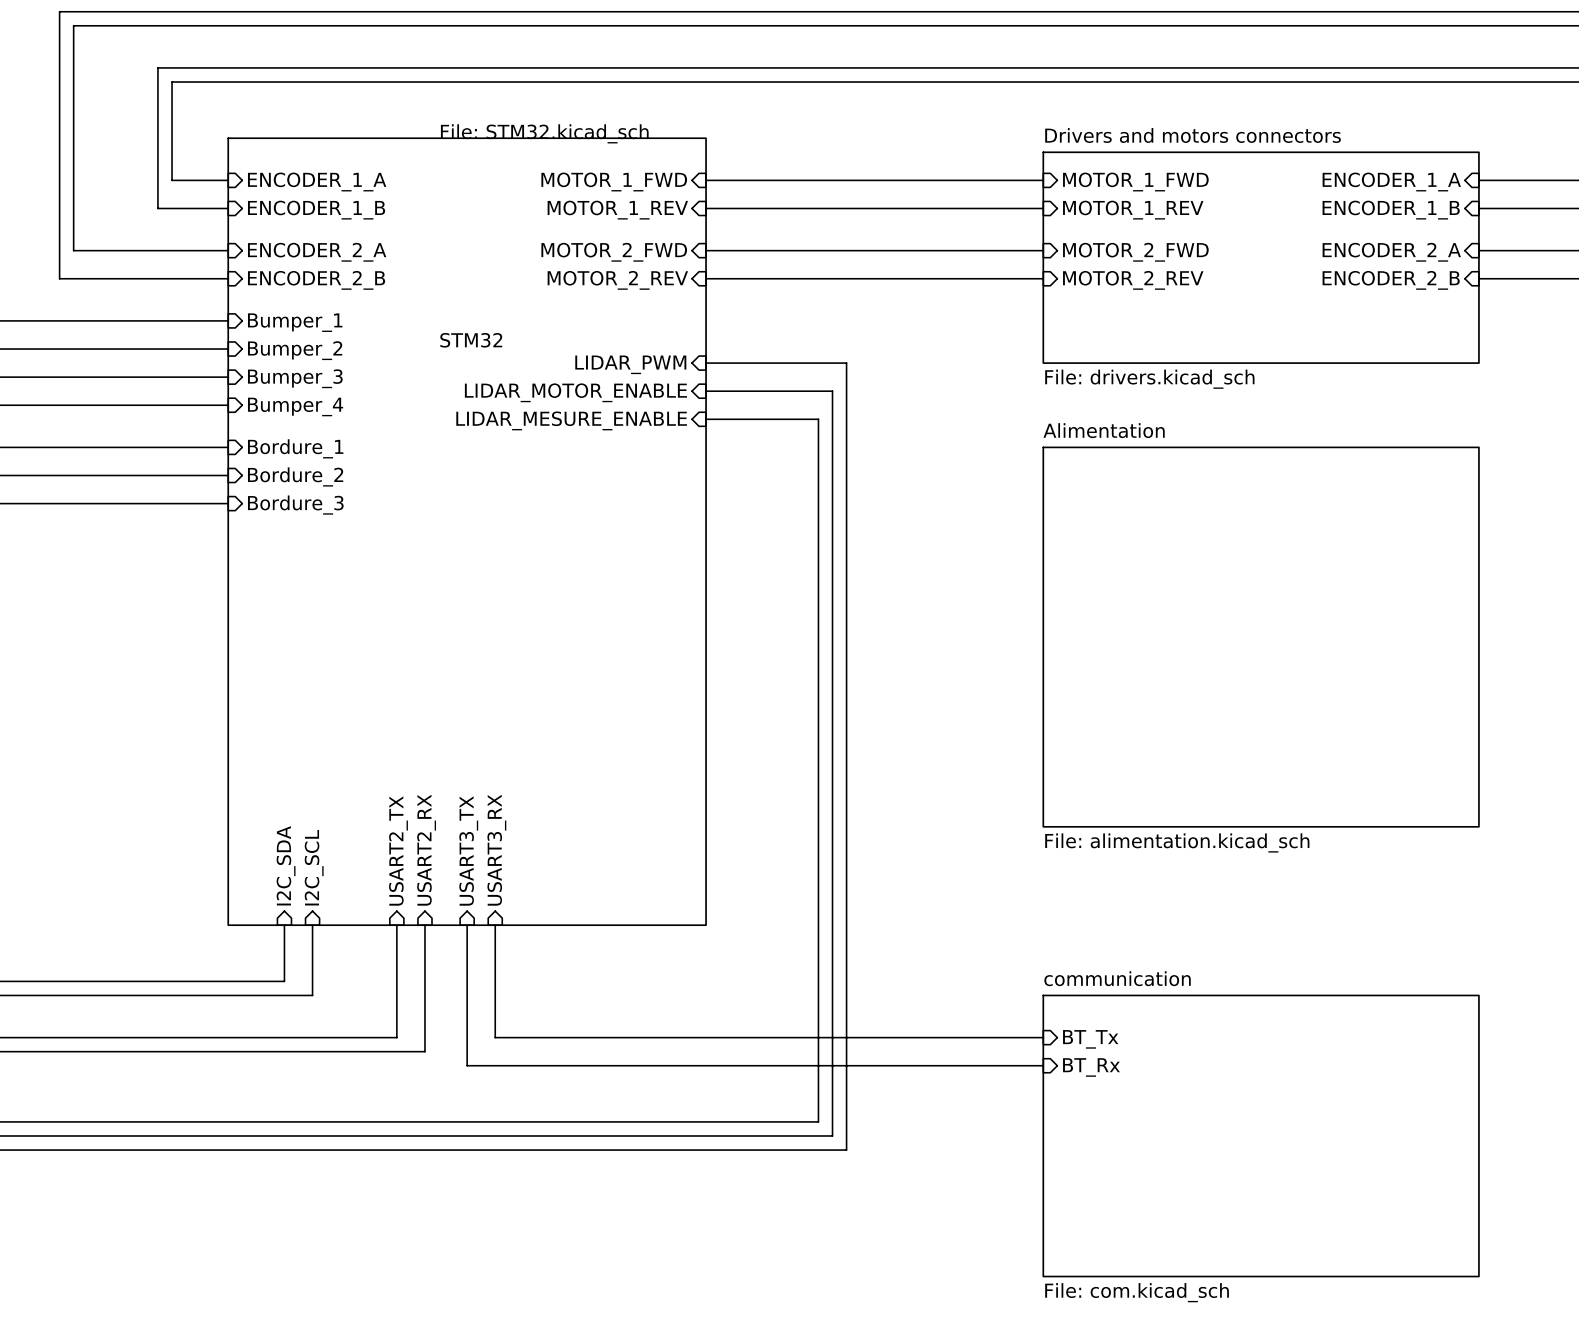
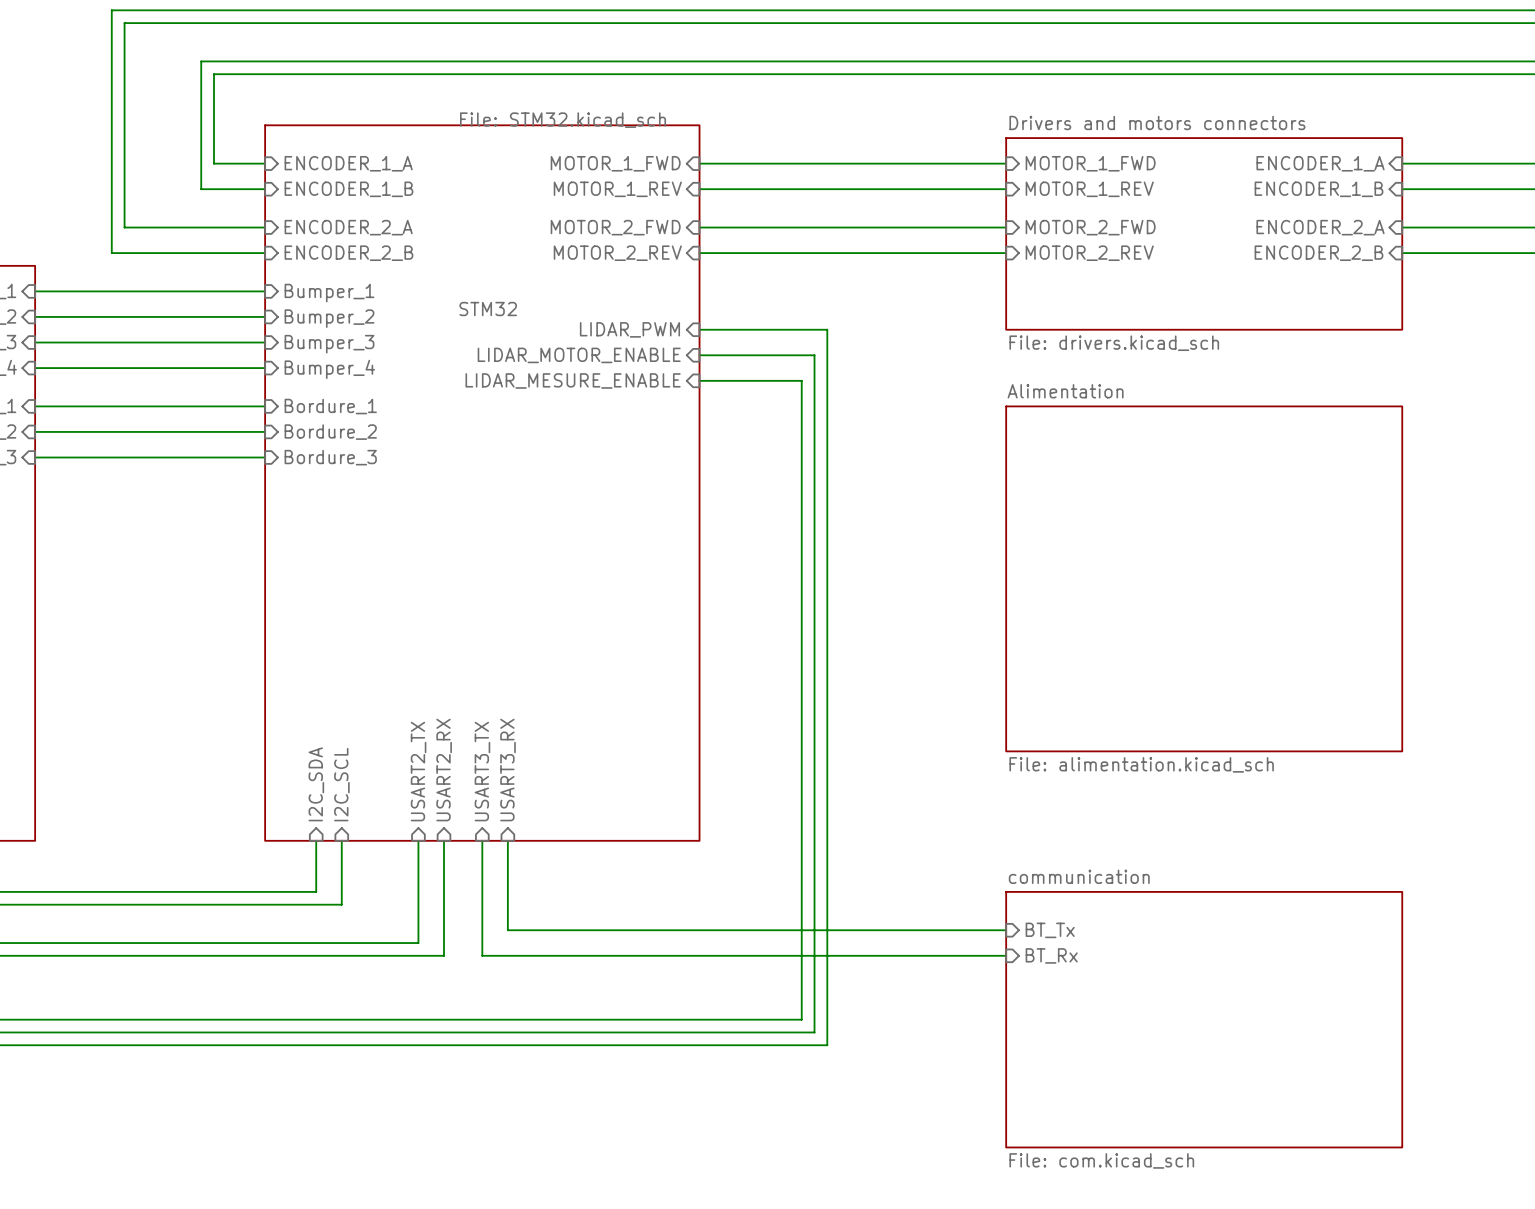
wire: (495, 1023) (495, 1037) (1043, 1037) -> (507, 930) (1006, 930)
sheet pin position: BT_Tx (1090, 1039) -> BT_Tx (1050, 930)
wire: (467, 1051) (467, 1065) (1043, 1065) -> (482, 955) (1006, 955)
sheet pin position: BT_Rx (1091, 1067) -> BT_Rx (1051, 955)
sheet communication position: (1261, 1135) -> (1204, 1019)

